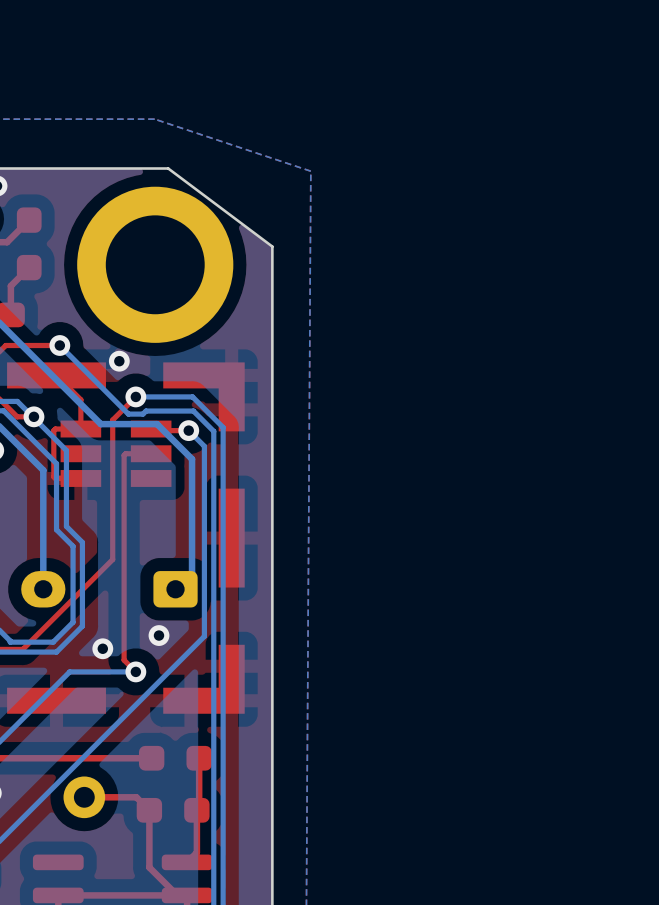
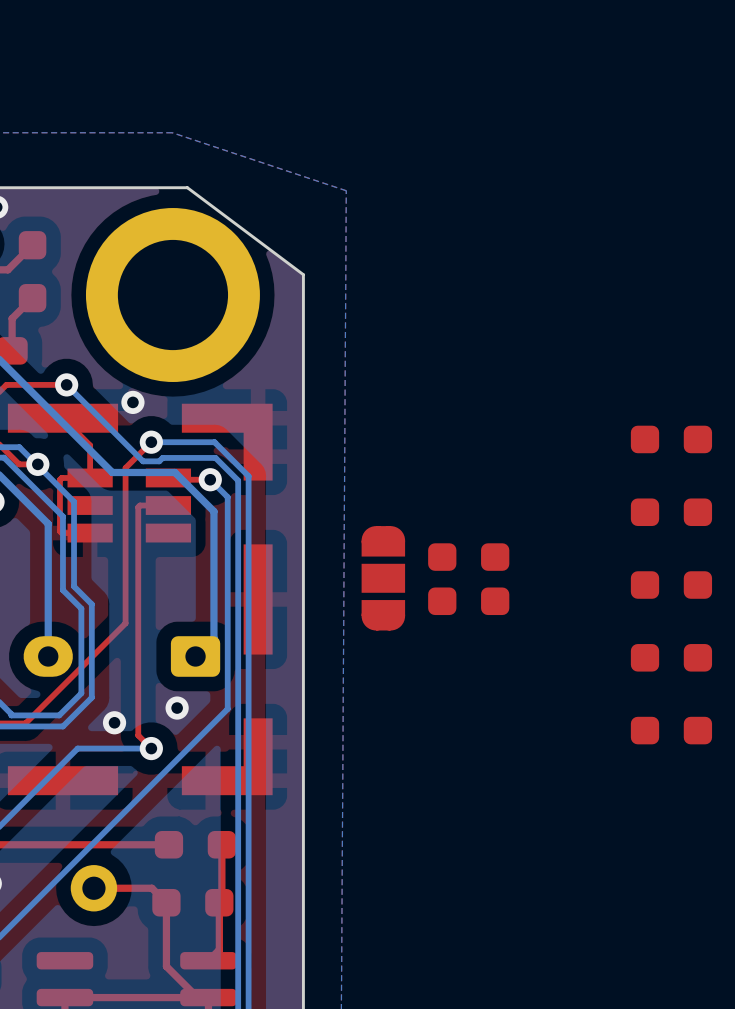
part: none -> (671, 439)
part: none -> (671, 512)
part: none -> (468, 557)
part: none -> (383, 578)
part: none -> (671, 585)
part: none -> (468, 601)
part: none -> (671, 657)
part: none -> (671, 730)

